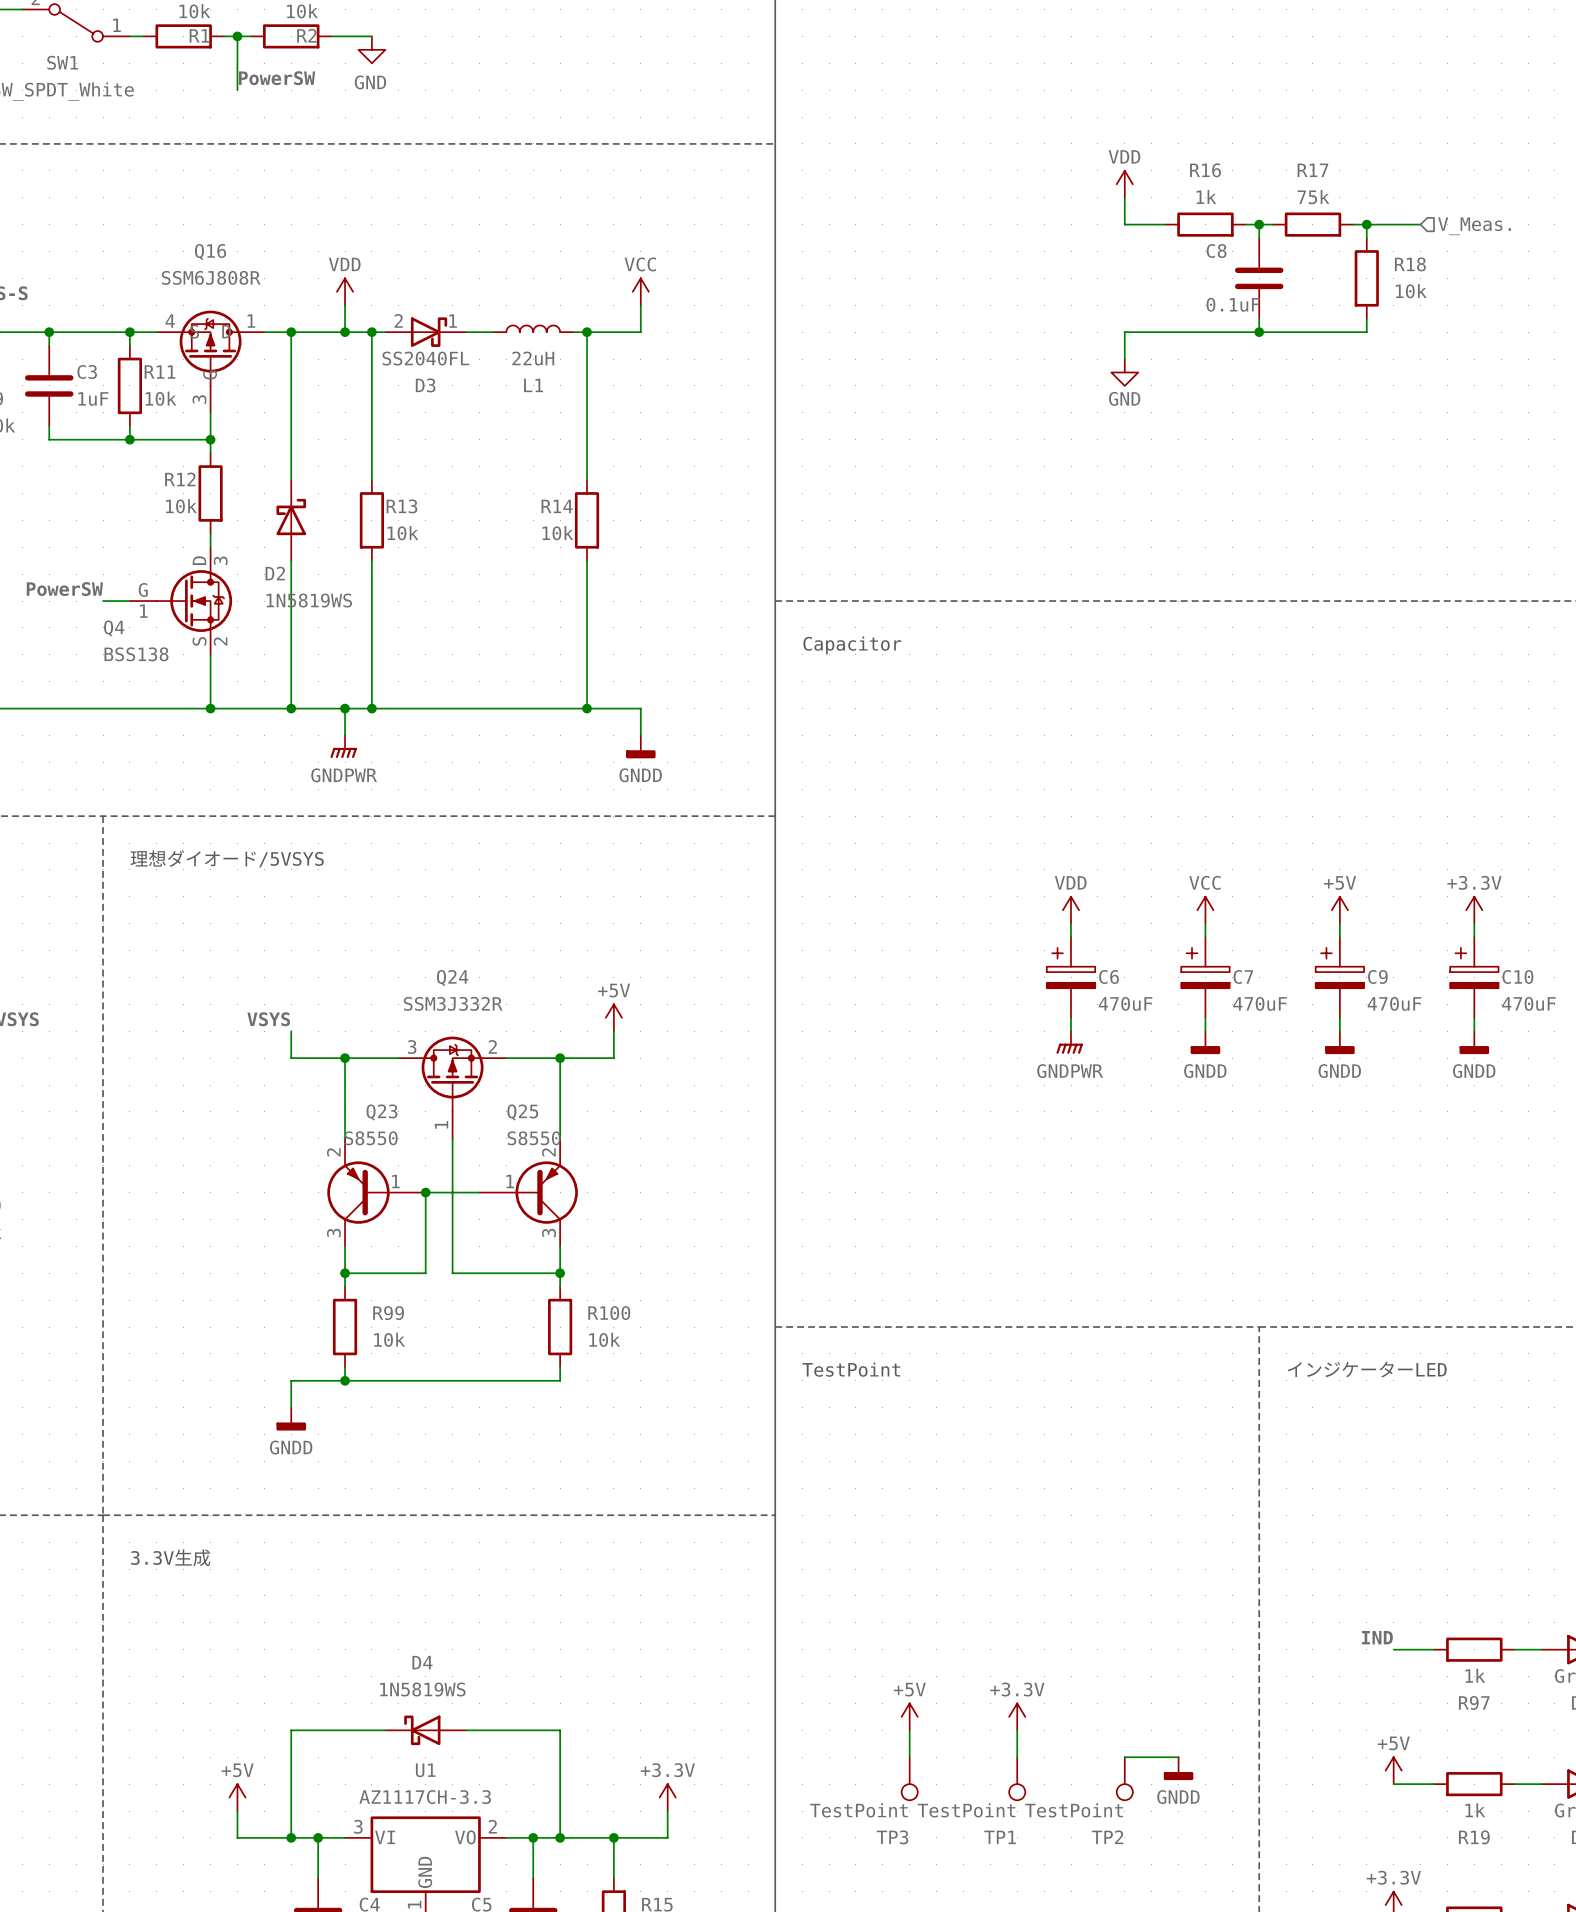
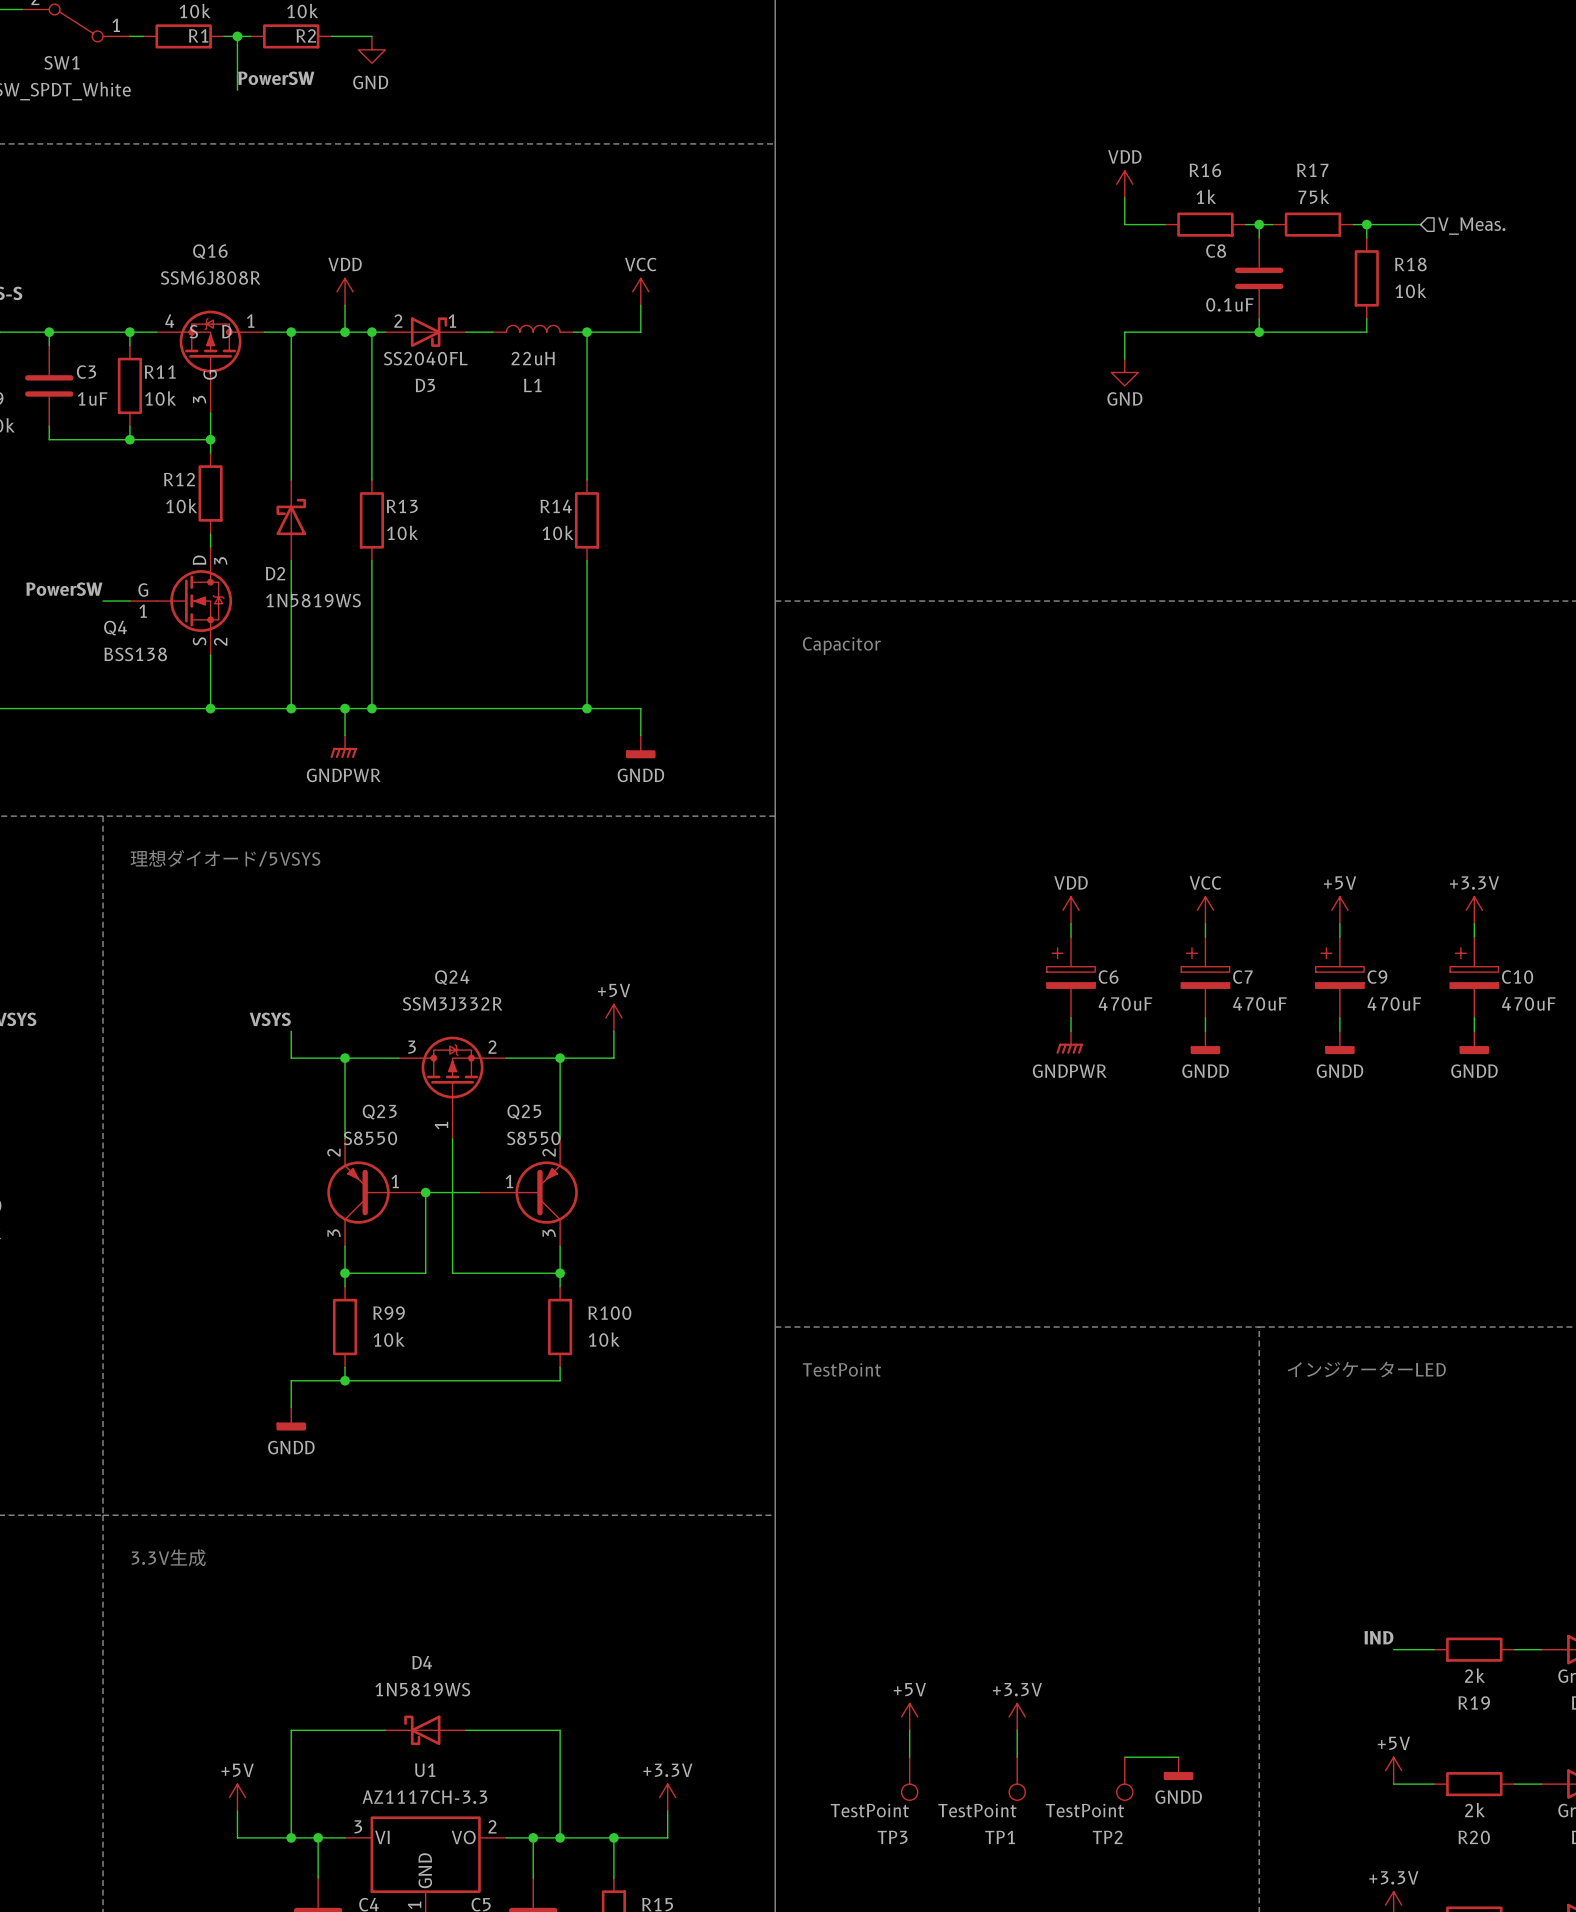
R97 value: 1k (1475, 1675) -> 2k (1474, 1675)
R97 name: R97 (1474, 1702) -> R19 (1474, 1703)
R19 value: 1k (1475, 1810) -> 2k (1474, 1810)
R19 name: R19 (1474, 1837) -> R20 (1474, 1837)

